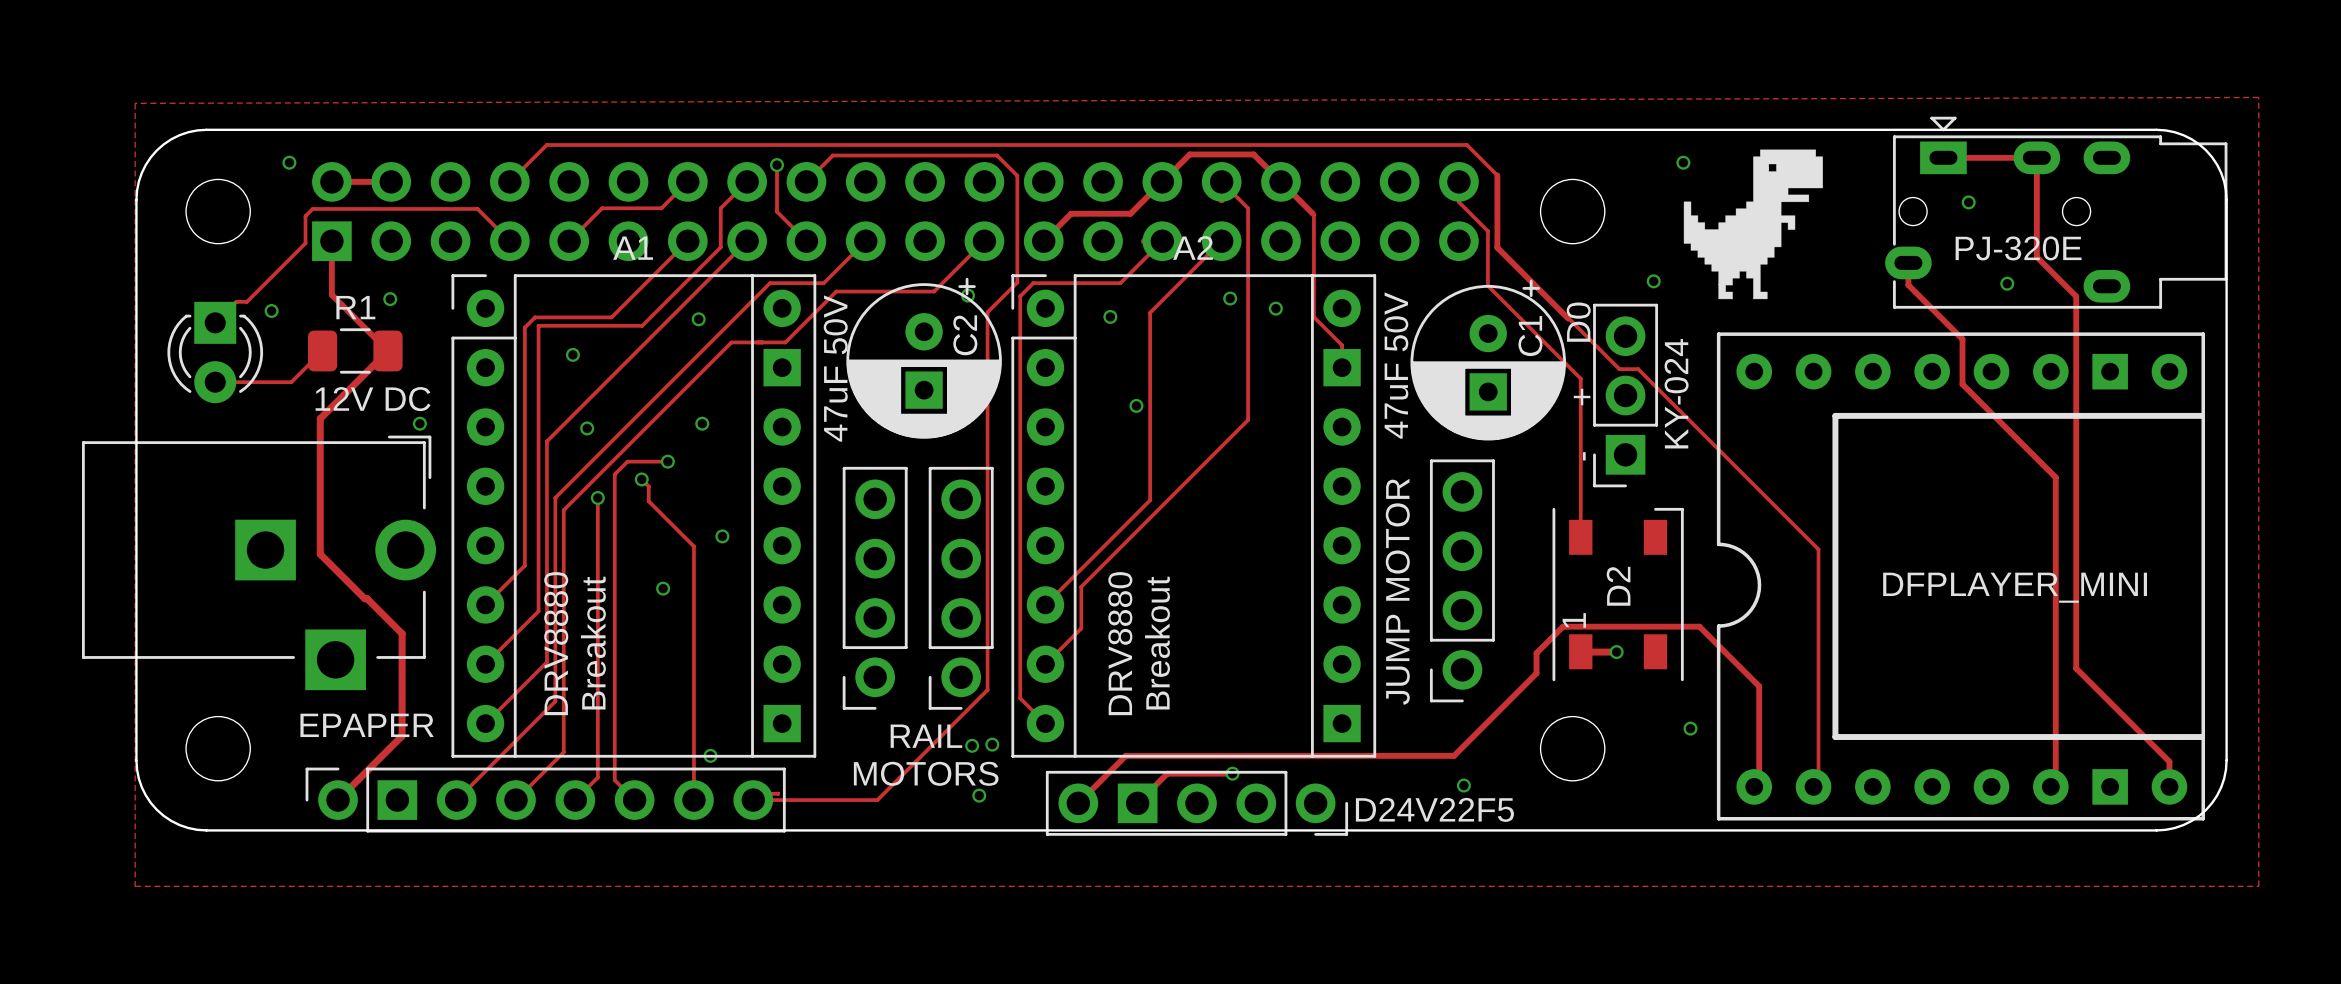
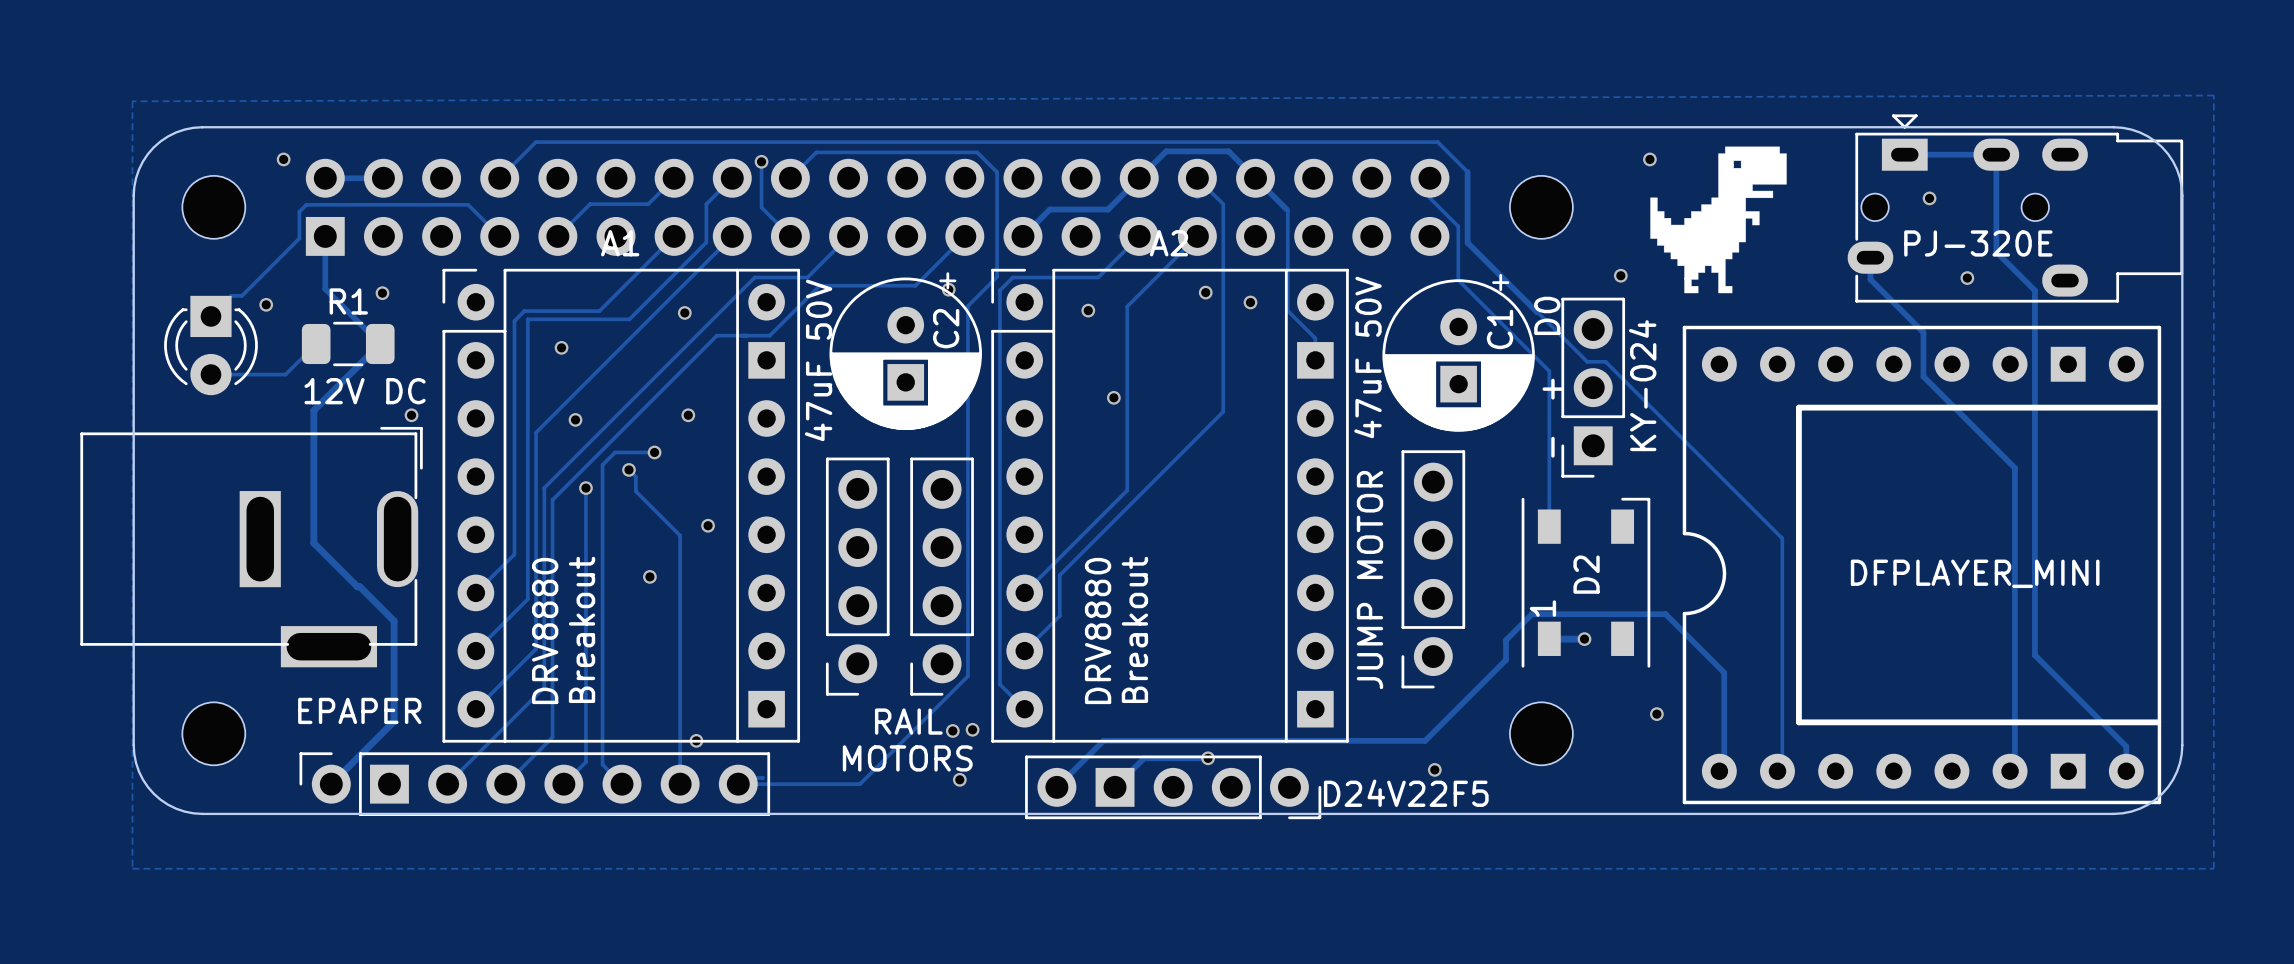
part footprint: [81, 435, 437, 691] -> [80, 426, 423, 668]

